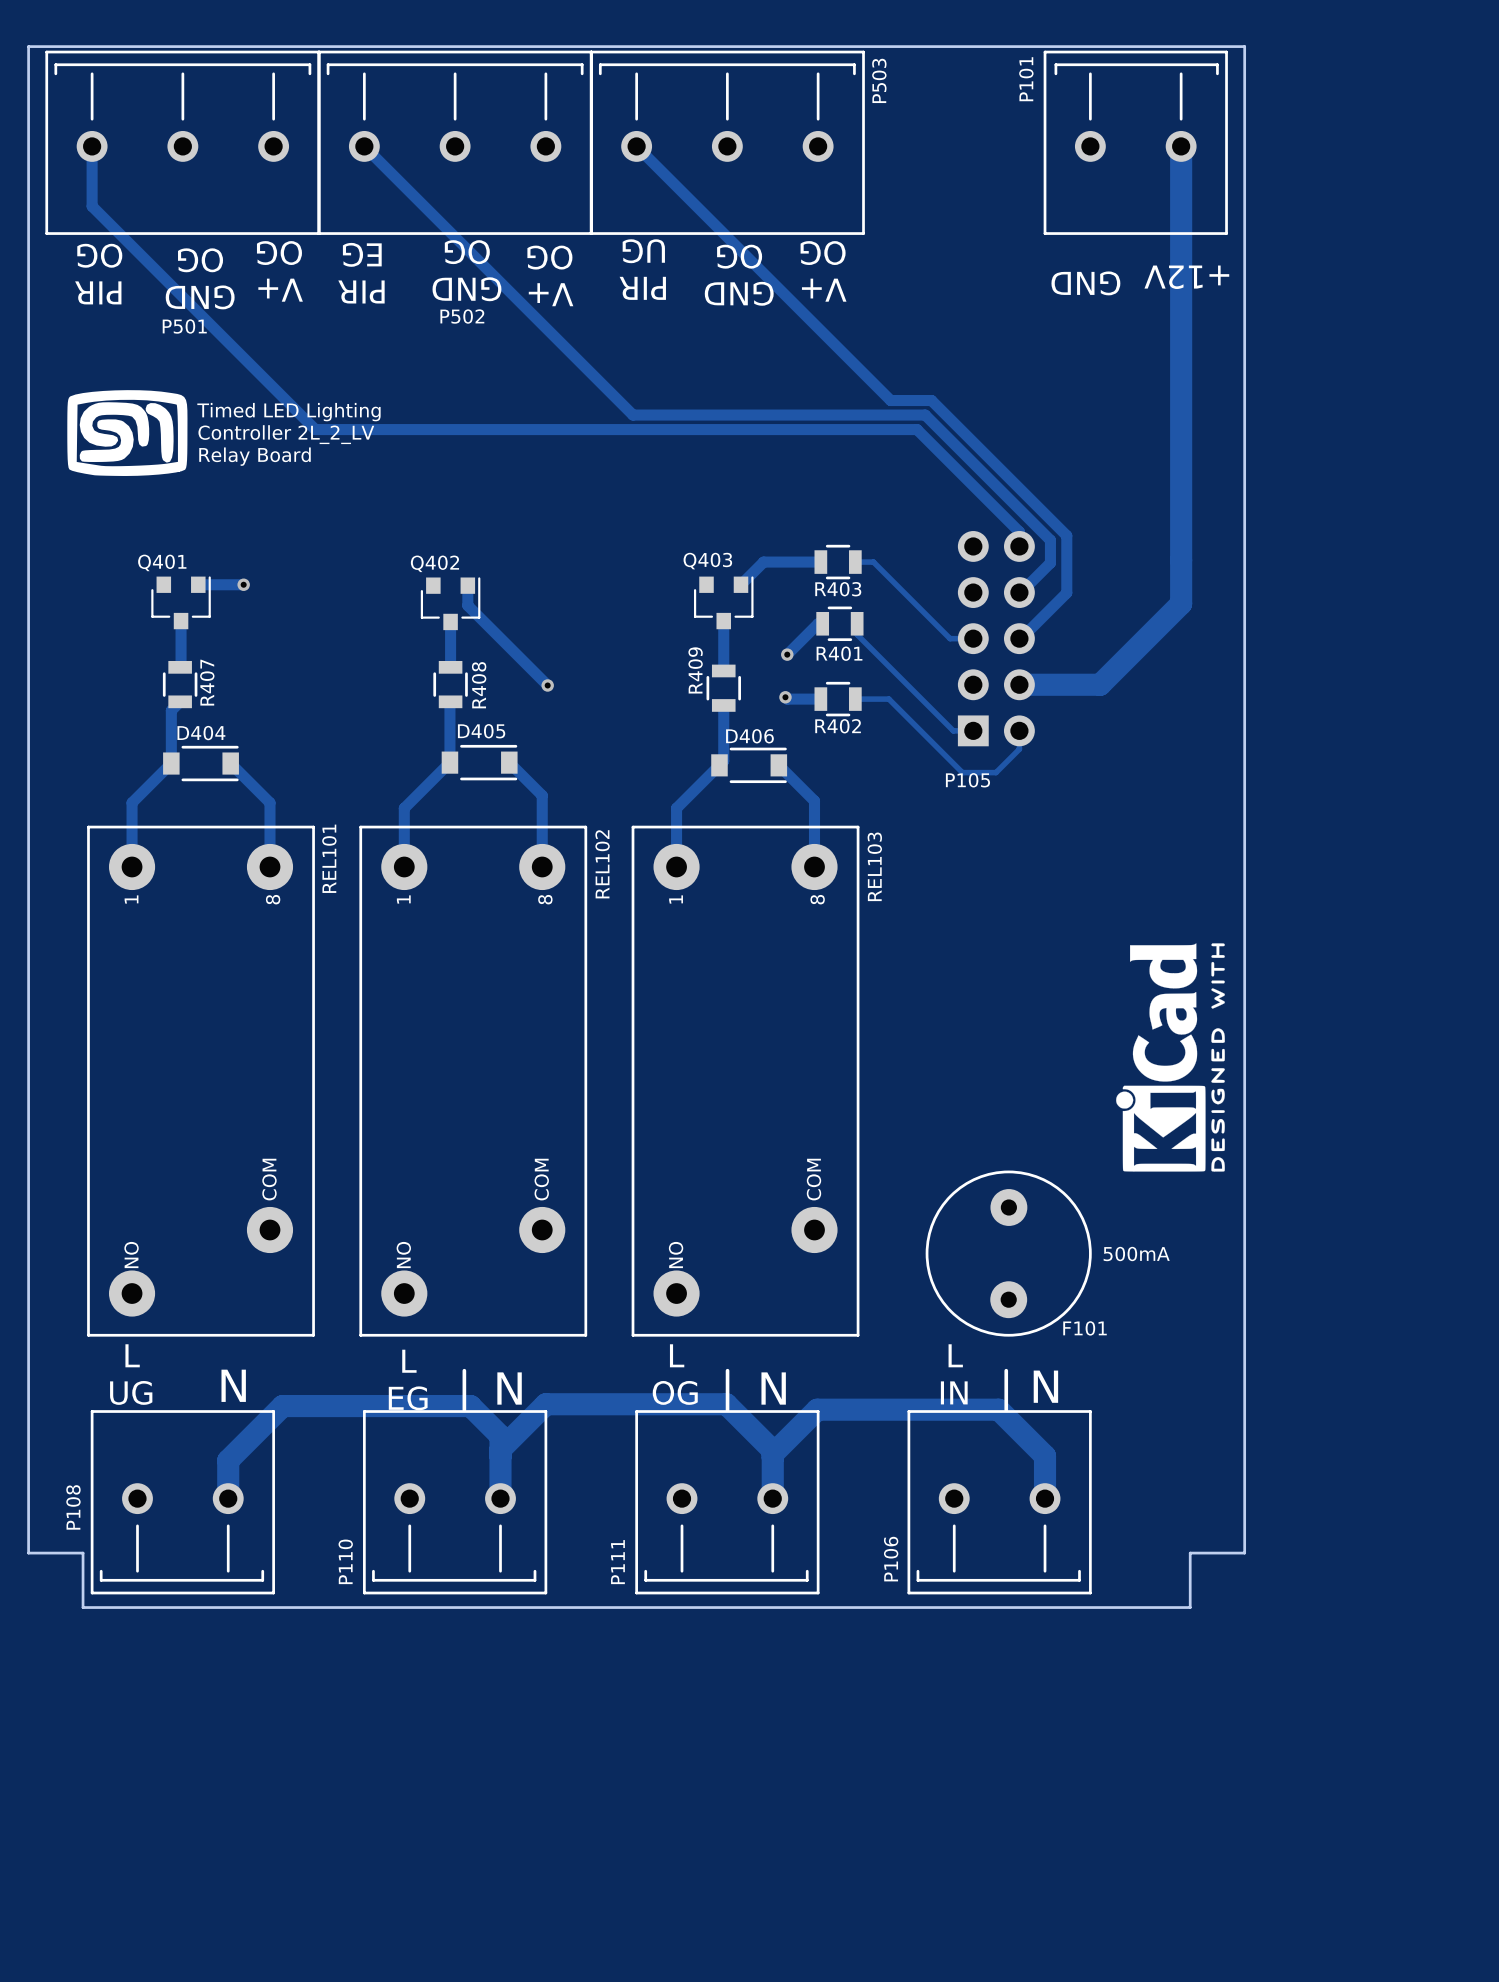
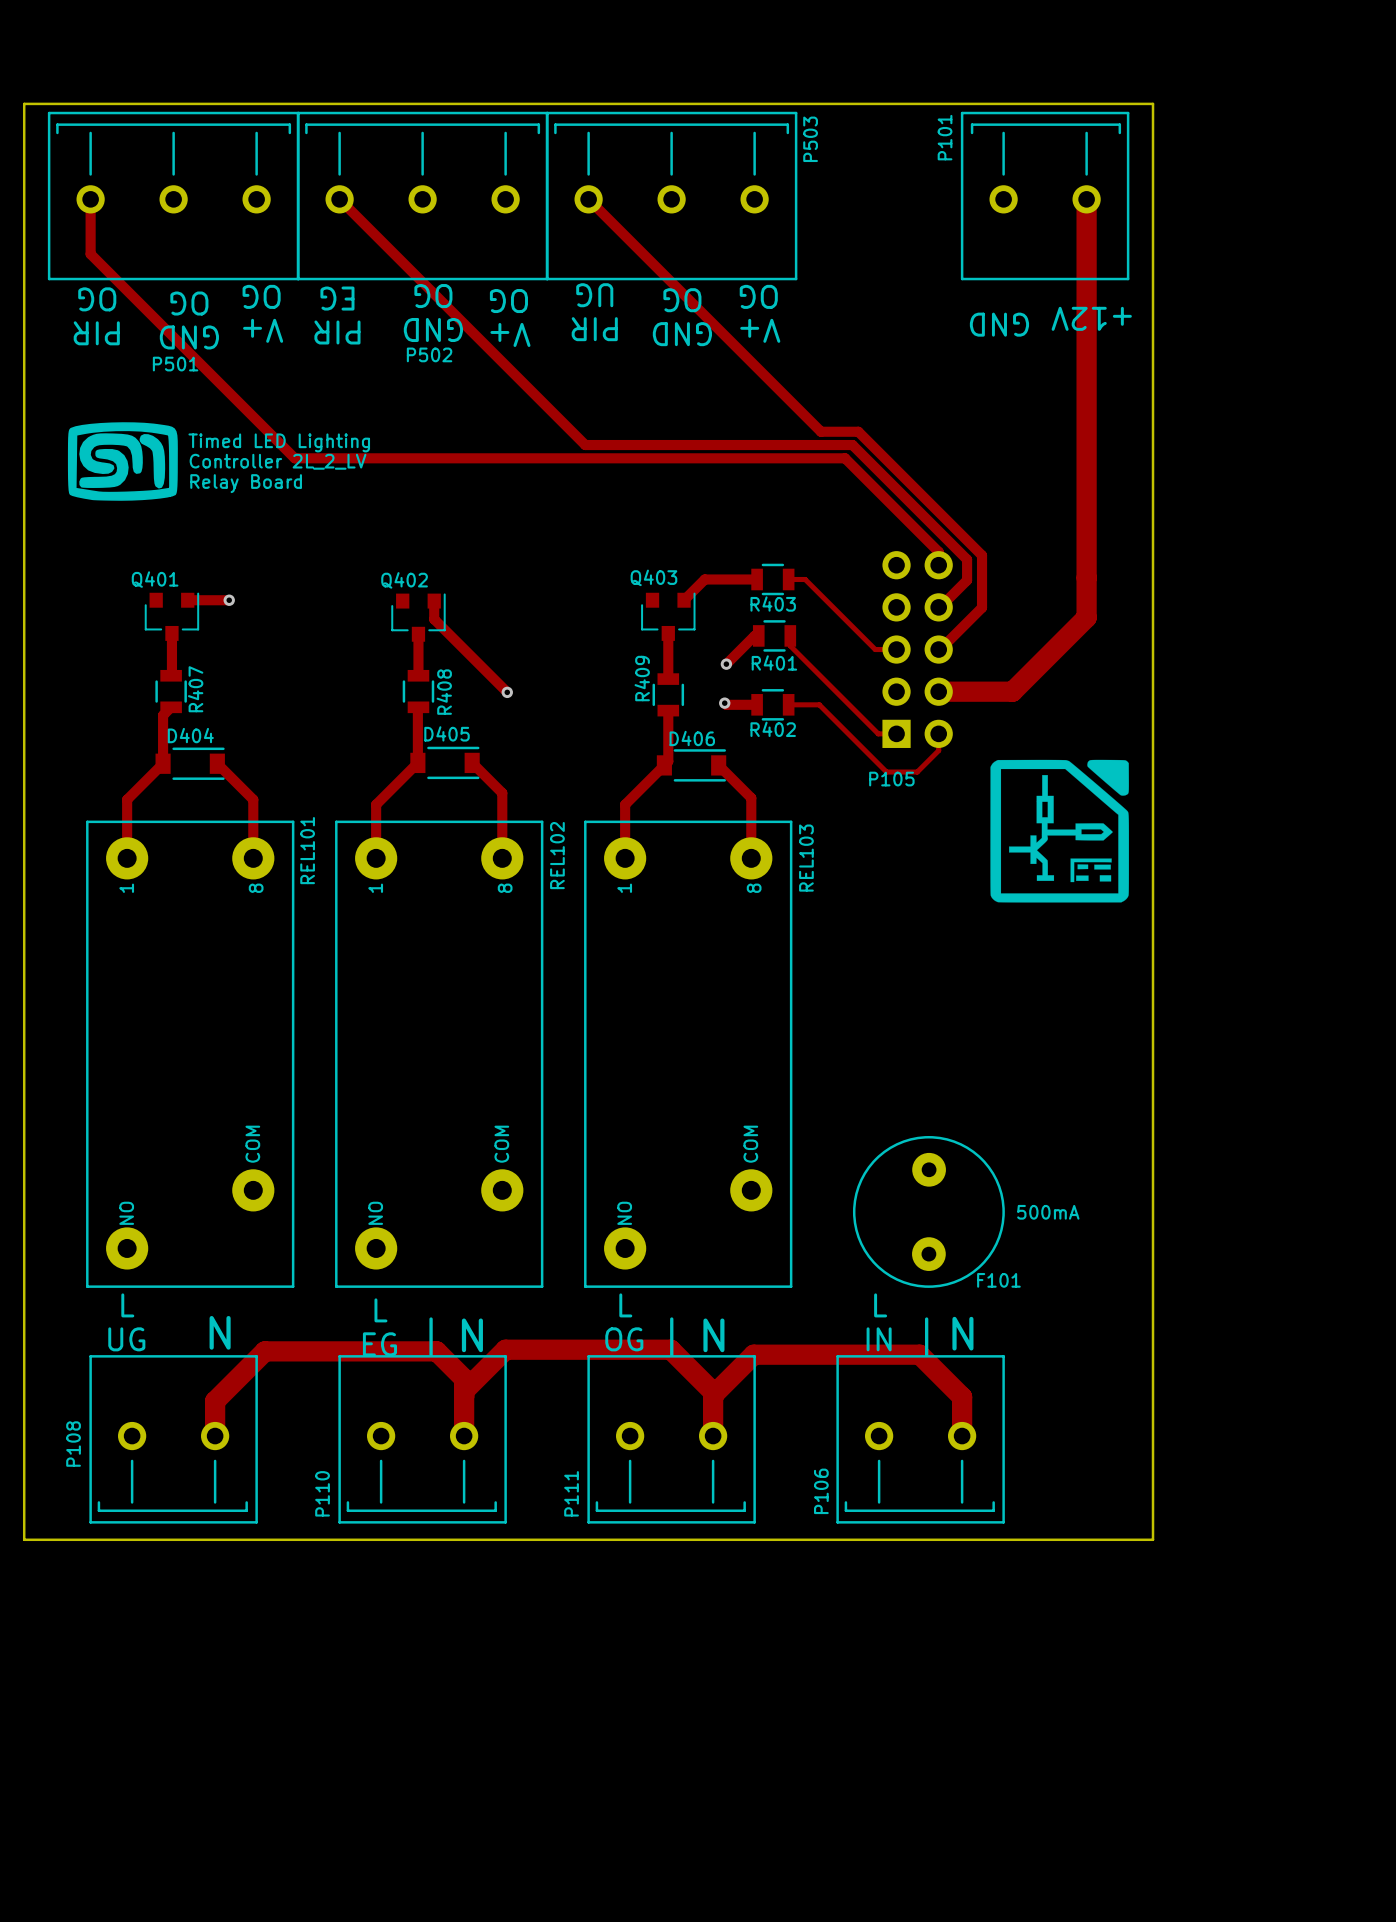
board edge: (28, 46) (1244, 46) (1244, 1553) (1190, 1553) (1190, 1607) (83, 1607) (83, 1553) (28, 1553) (28, 46) -> (24, 103) (24, 1539) (1153, 1539) (1153, 103) (24, 103)
drawing: none -> [990, 759, 1129, 903]
drawing: [1116, 943, 1225, 1172] -> none

